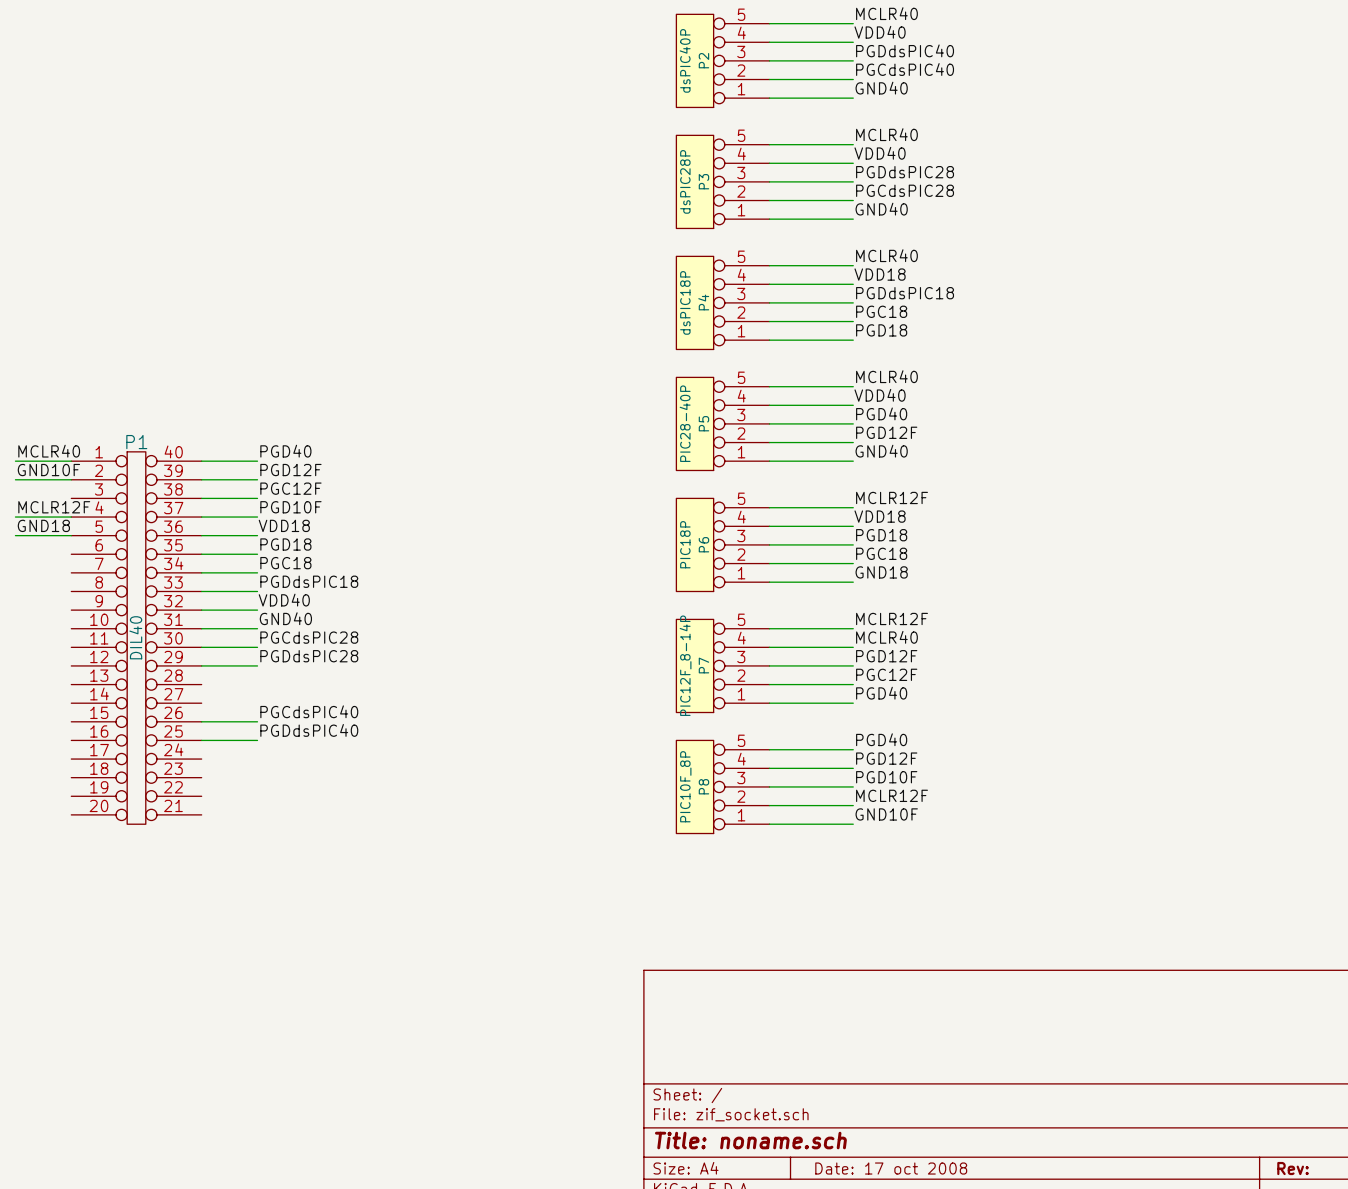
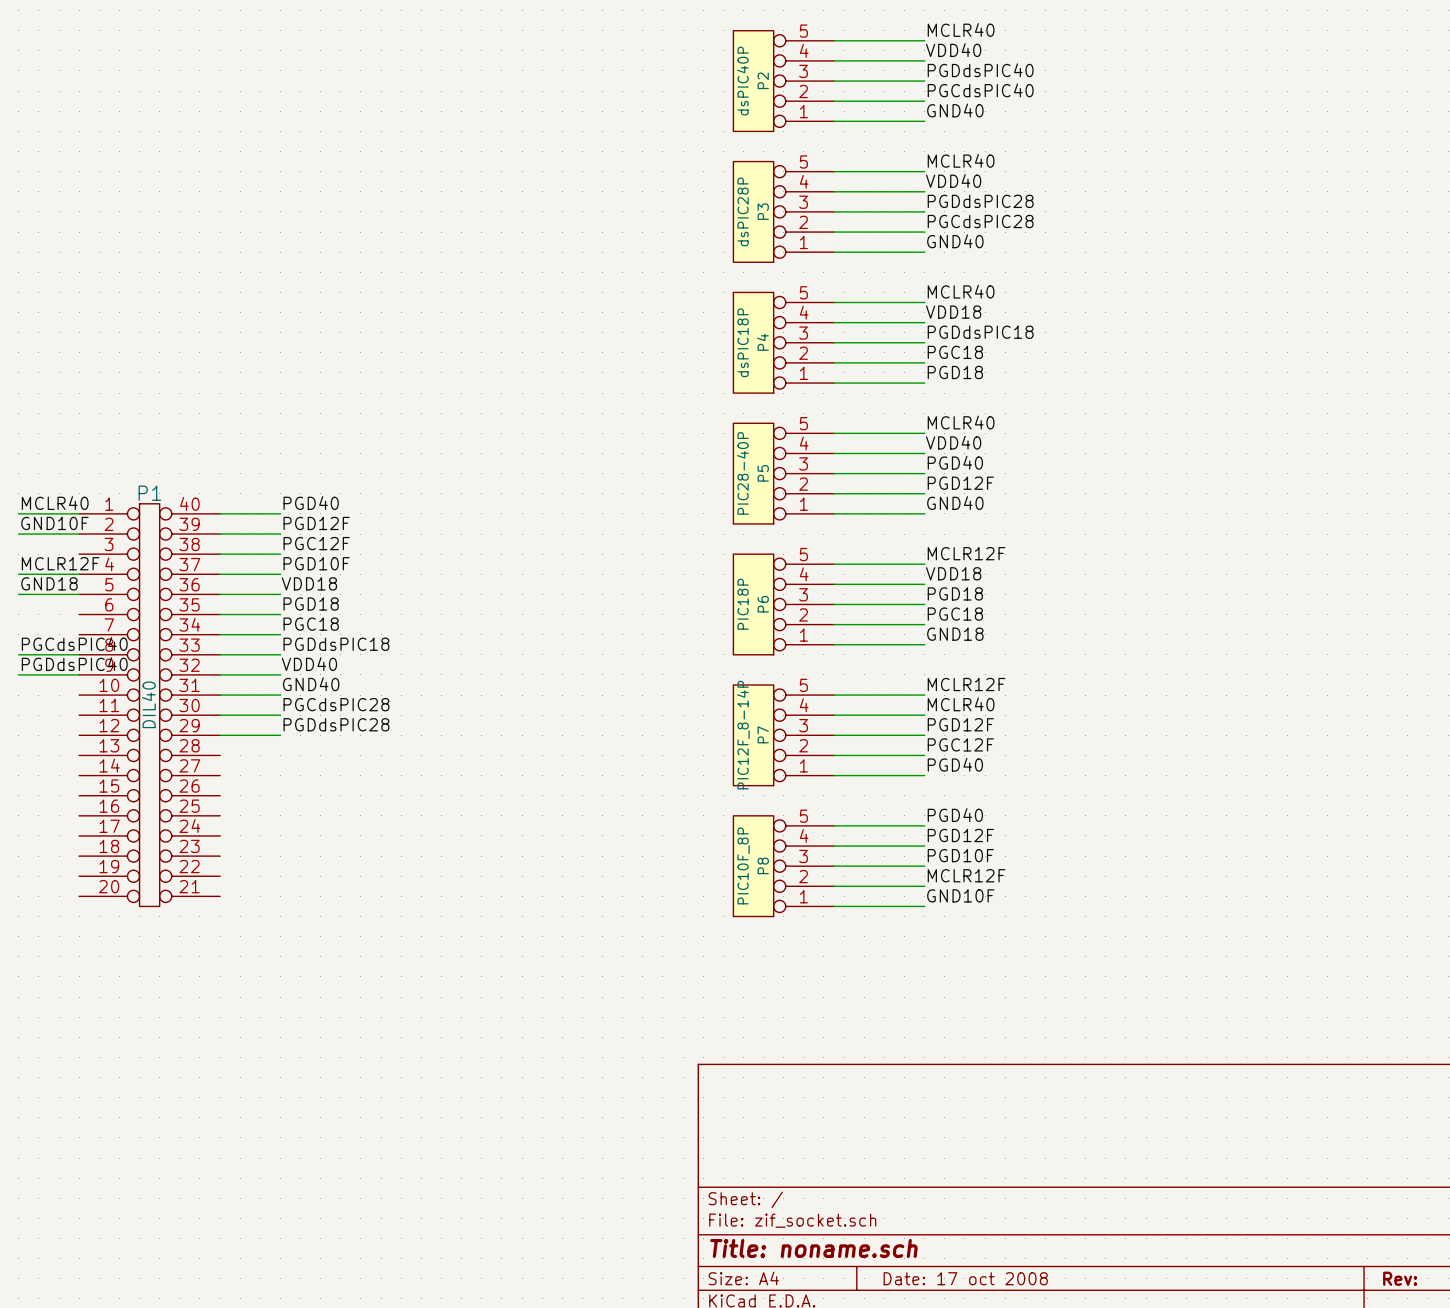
label: none -> PGCdsPIC40 (74, 643)
wire: none -> (18, 654) (79, 654)
label: none -> PGDdsPIC40 (74, 664)
wire: none -> (18, 674) (79, 674)
label: PGCdsPIC40 (309, 711) -> none
wire: (201, 721) (257, 721) -> none
label: PGDdsPIC40 (309, 730) -> none
wire: (201, 740) (257, 740) -> none

